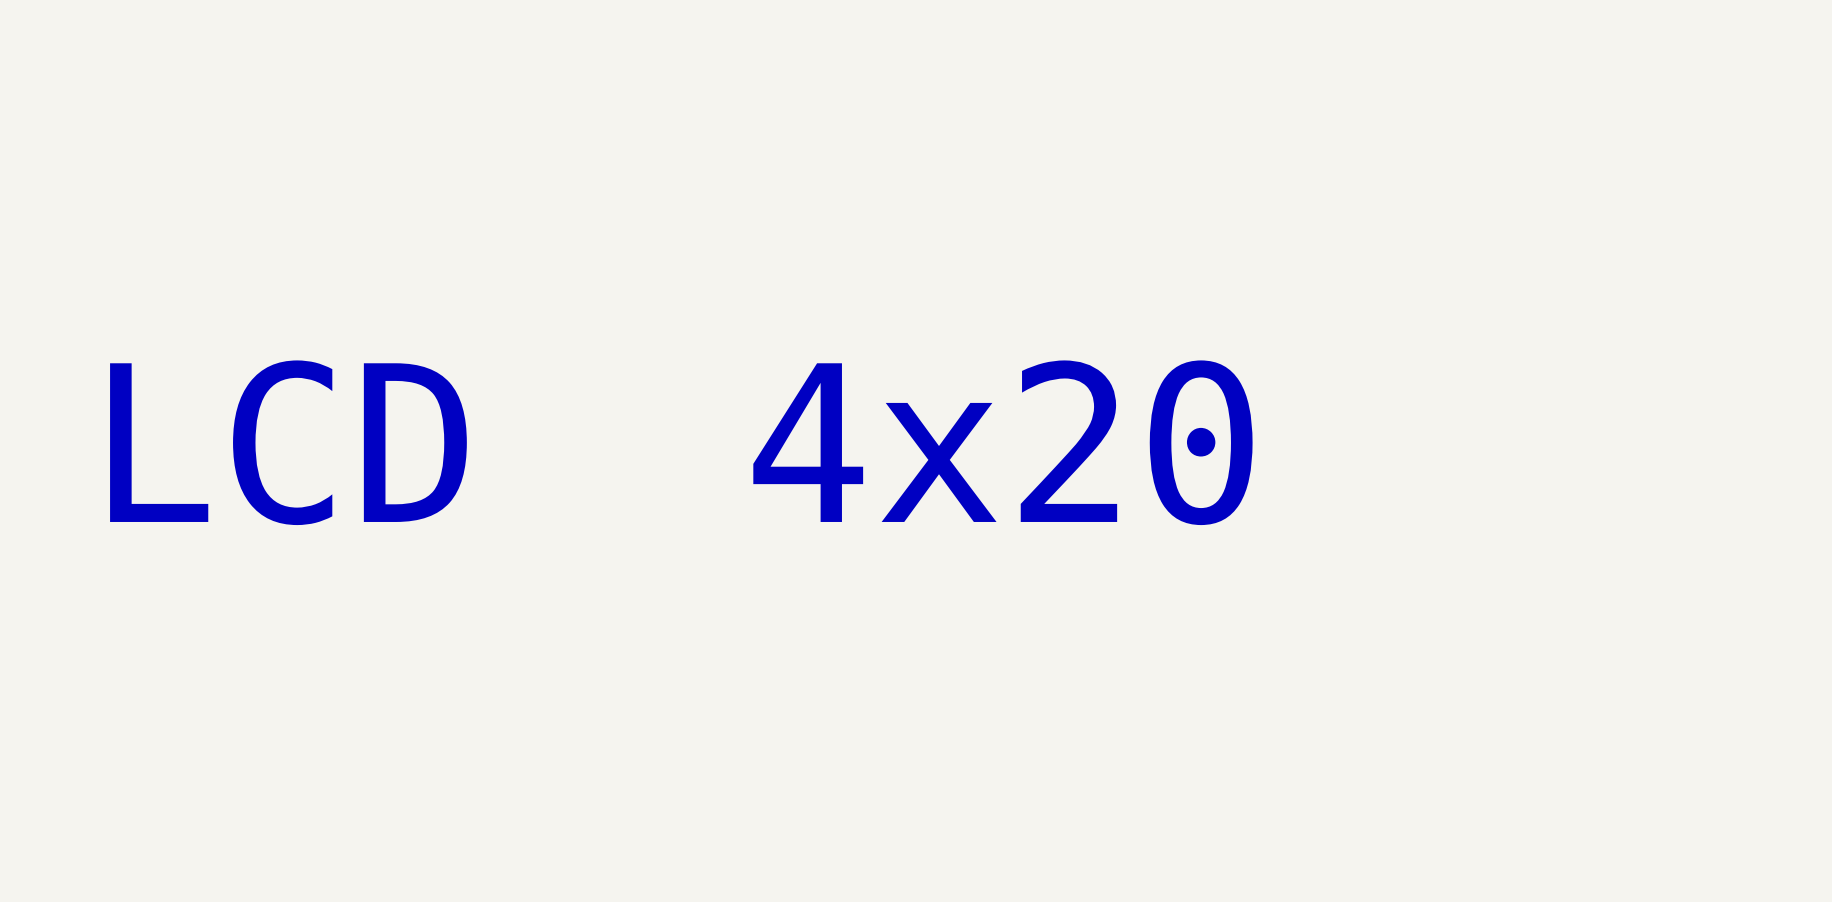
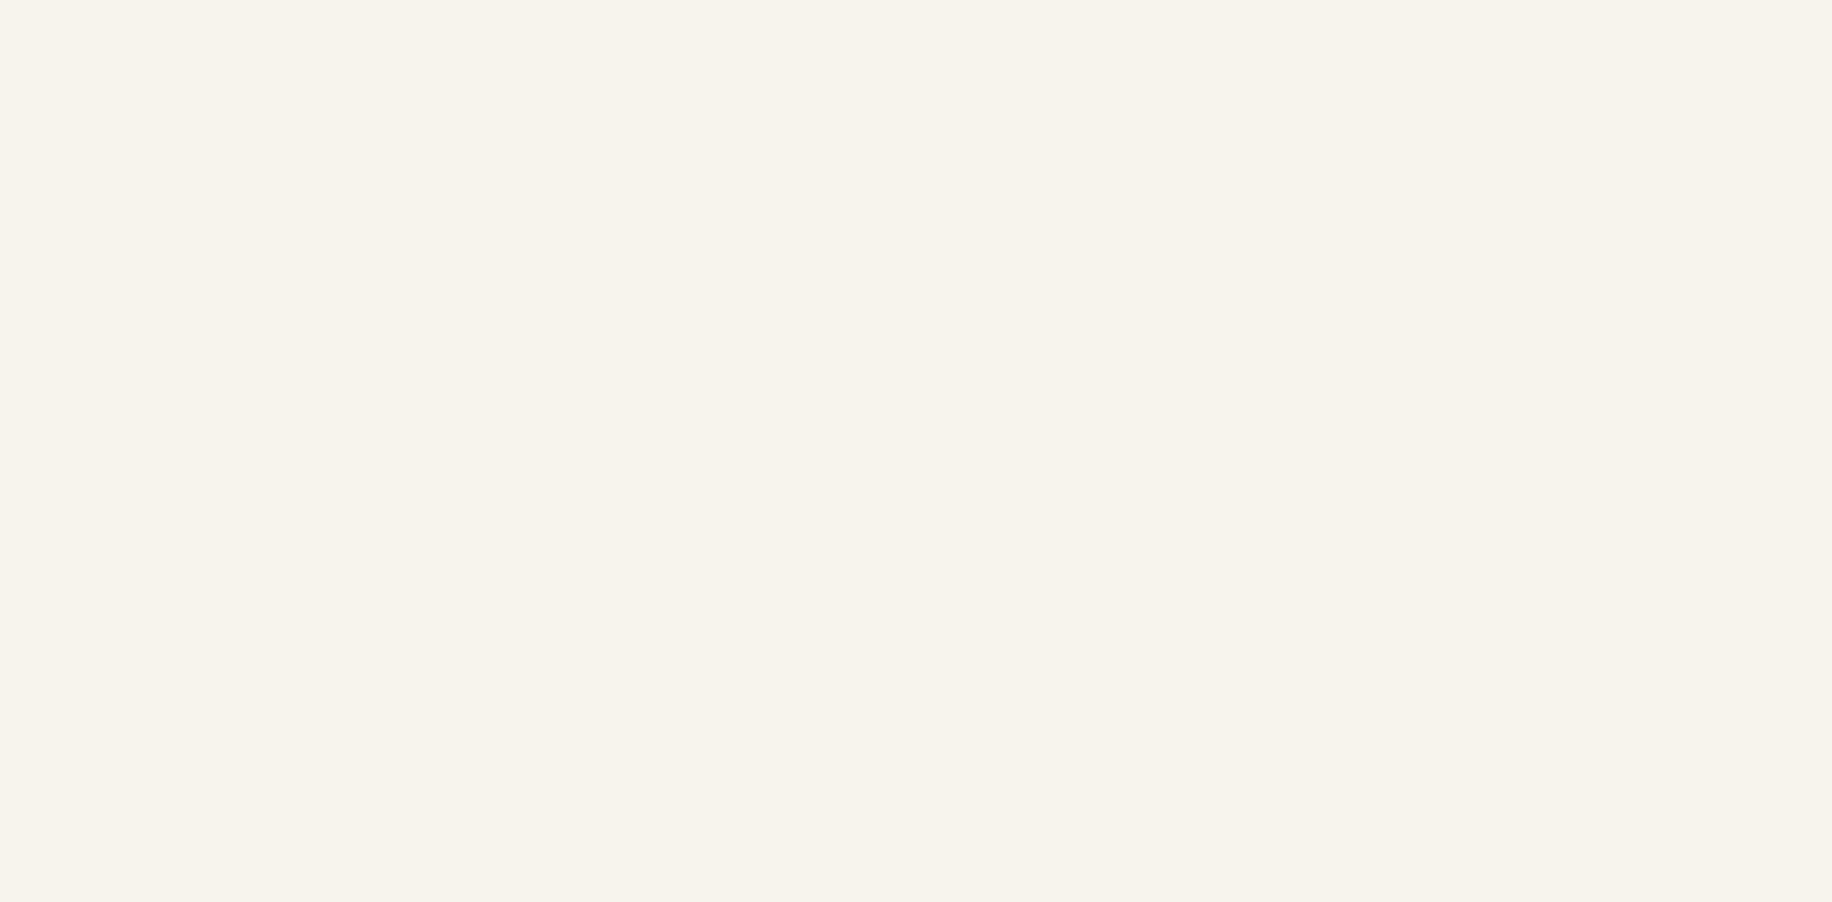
text: LCD 4x20 (681, 442) -> none

